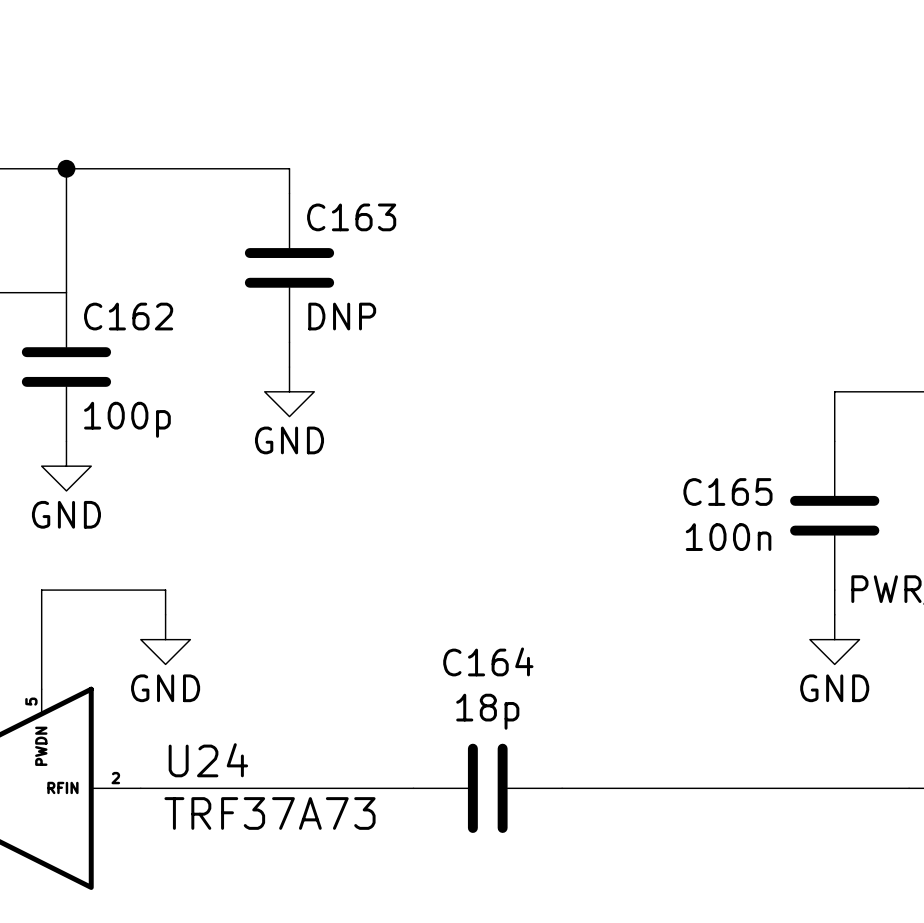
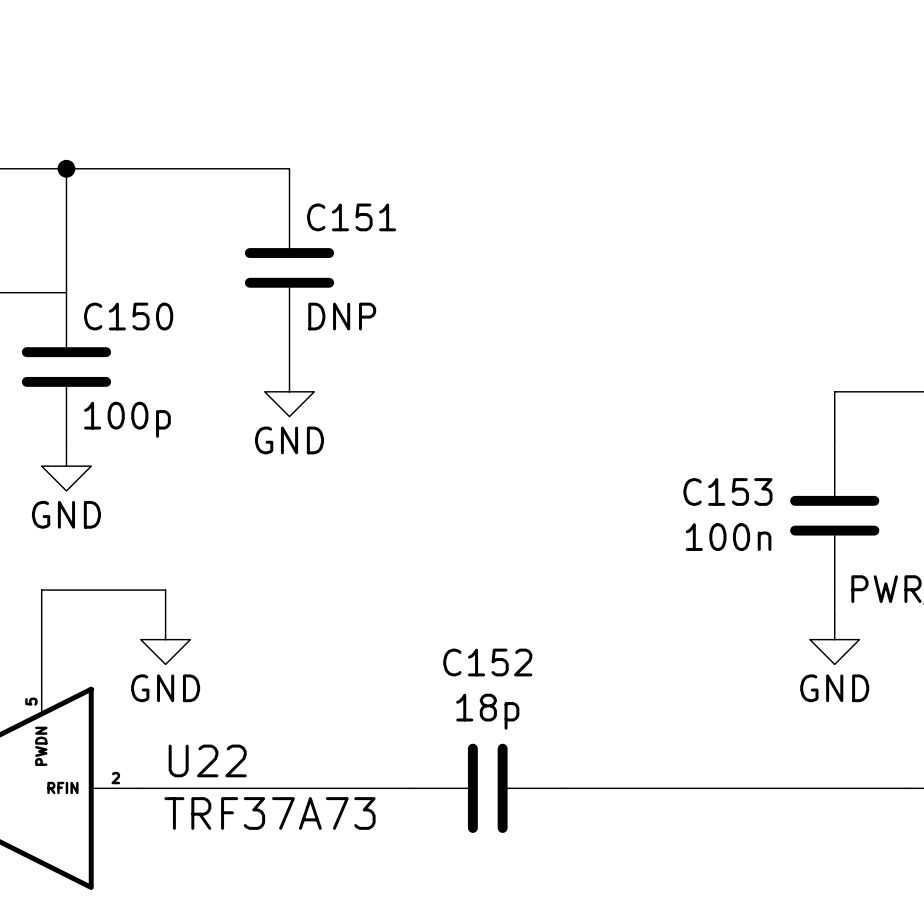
C163 name: C163 (351, 217) -> C151 (351, 217)
C162 name: C162 (128, 316) -> C150 (128, 316)
C165 name: C165 (727, 492) -> C153 (727, 492)
C164 name: C164 (488, 661) -> C152 (487, 662)
U24 name: U24 (208, 760) -> U22 (207, 760)

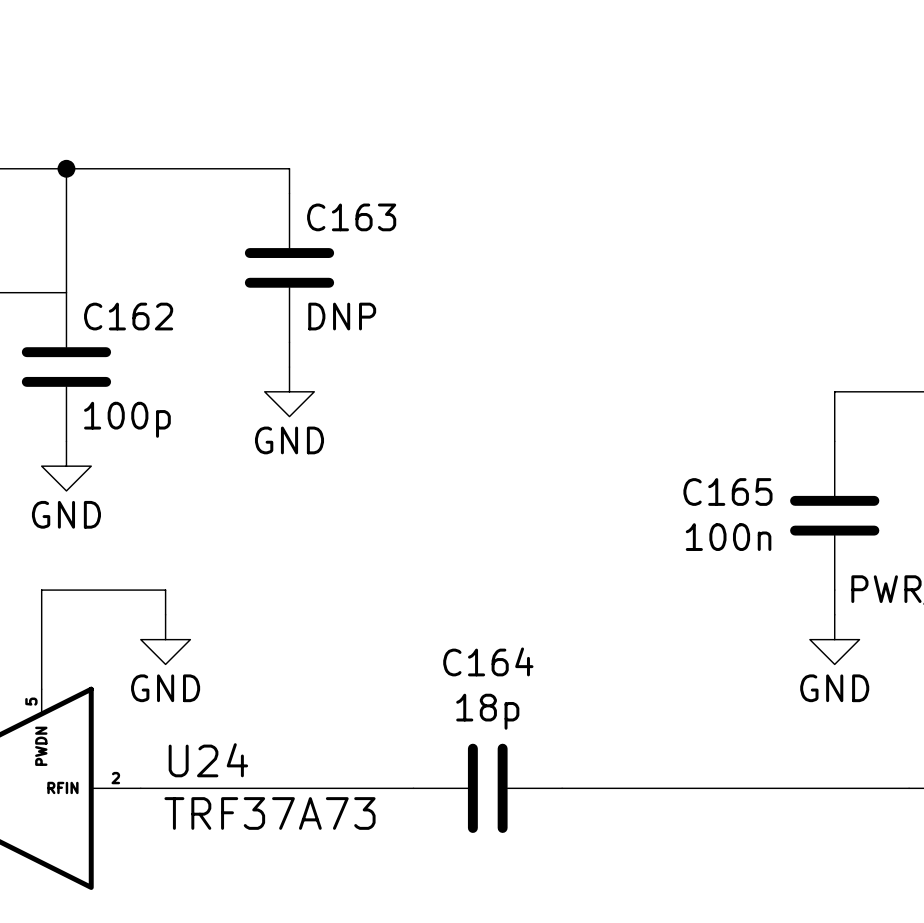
C151 name: C151 (351, 217) -> C163 (351, 217)
C150 name: C150 (128, 316) -> C162 (128, 316)
C153 name: C153 (727, 492) -> C165 (727, 492)
C152 name: C152 (487, 662) -> C164 (488, 661)
U22 name: U22 (207, 760) -> U24 (208, 760)

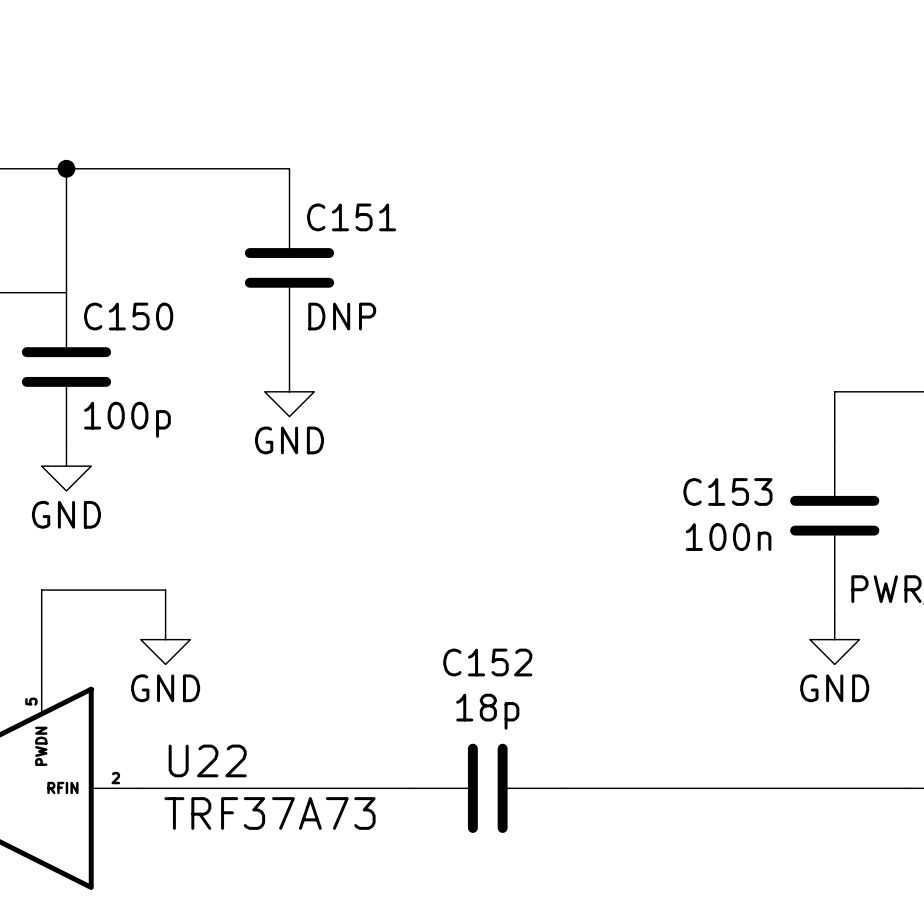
C163 name: C163 (351, 217) -> C151 (351, 217)
C162 name: C162 (128, 316) -> C150 (128, 316)
C165 name: C165 (727, 492) -> C153 (727, 492)
C164 name: C164 (488, 661) -> C152 (487, 662)
U24 name: U24 (208, 760) -> U22 (207, 760)

